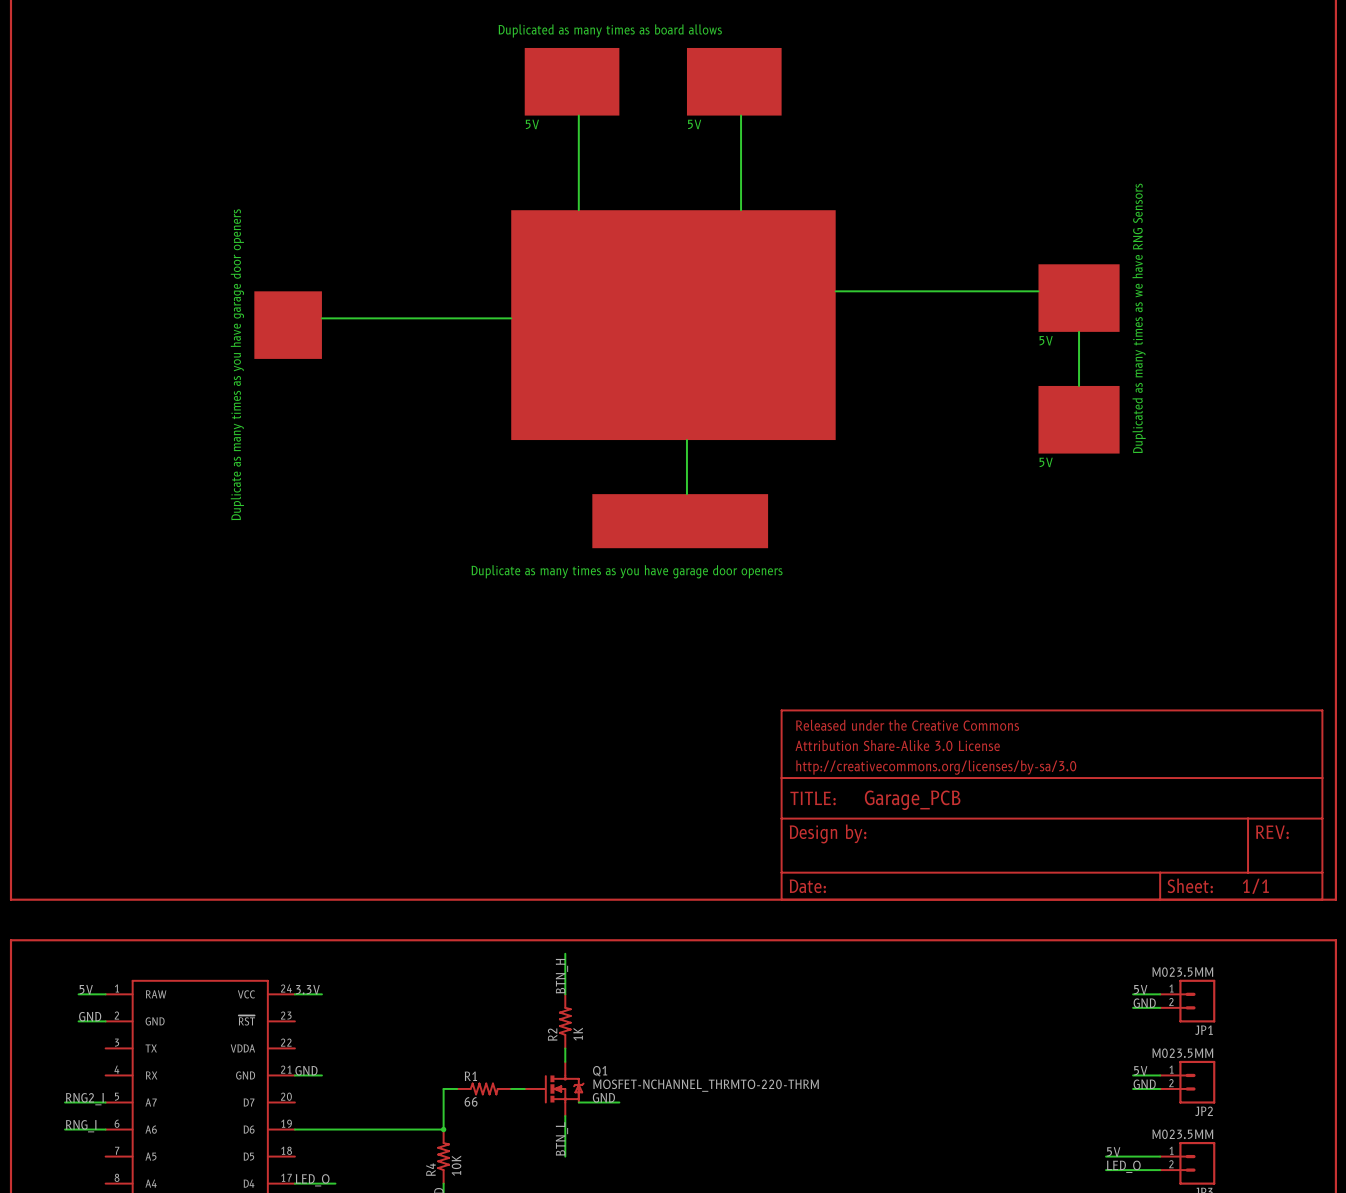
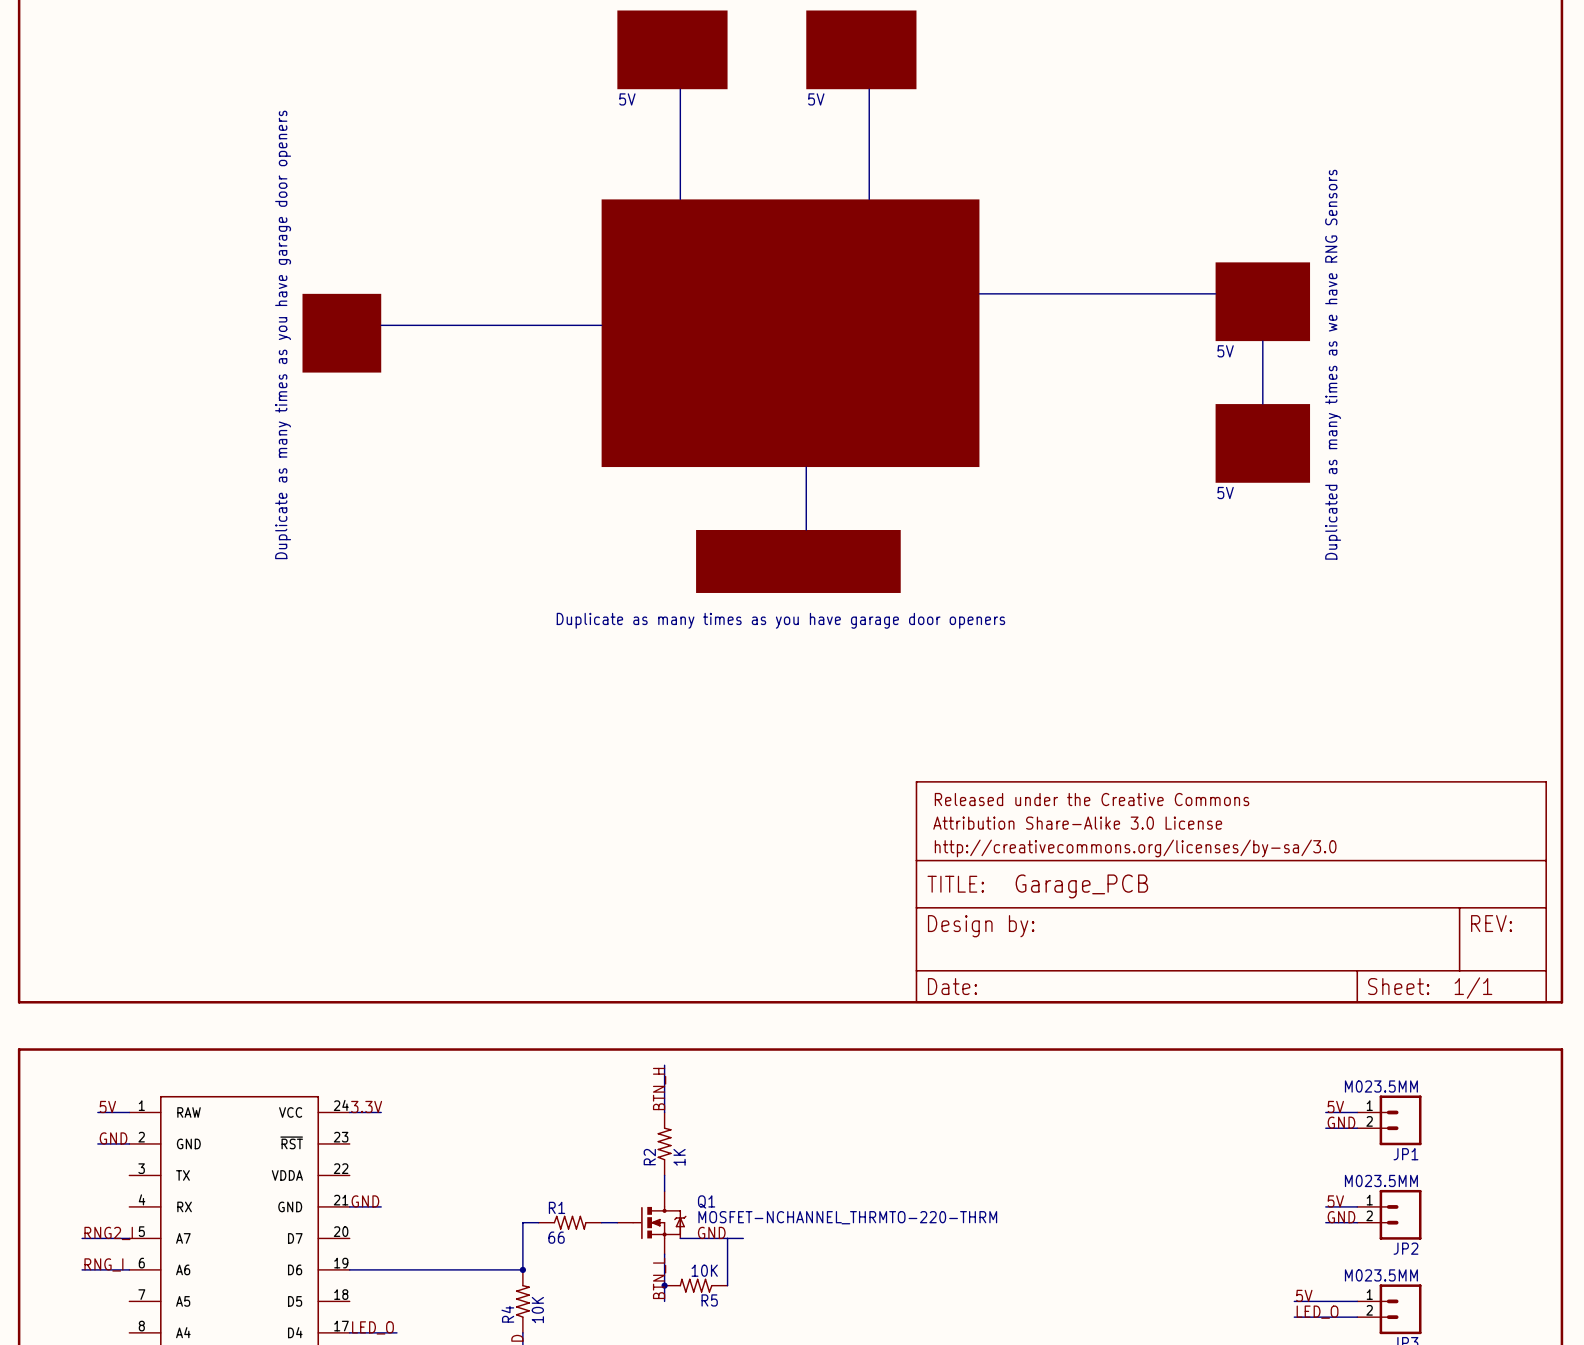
wire: none -> (743, 1238) (727, 1238) (727, 1285)
junction: none -> (664, 1285)
R5: none -> 10K (696, 1285)

